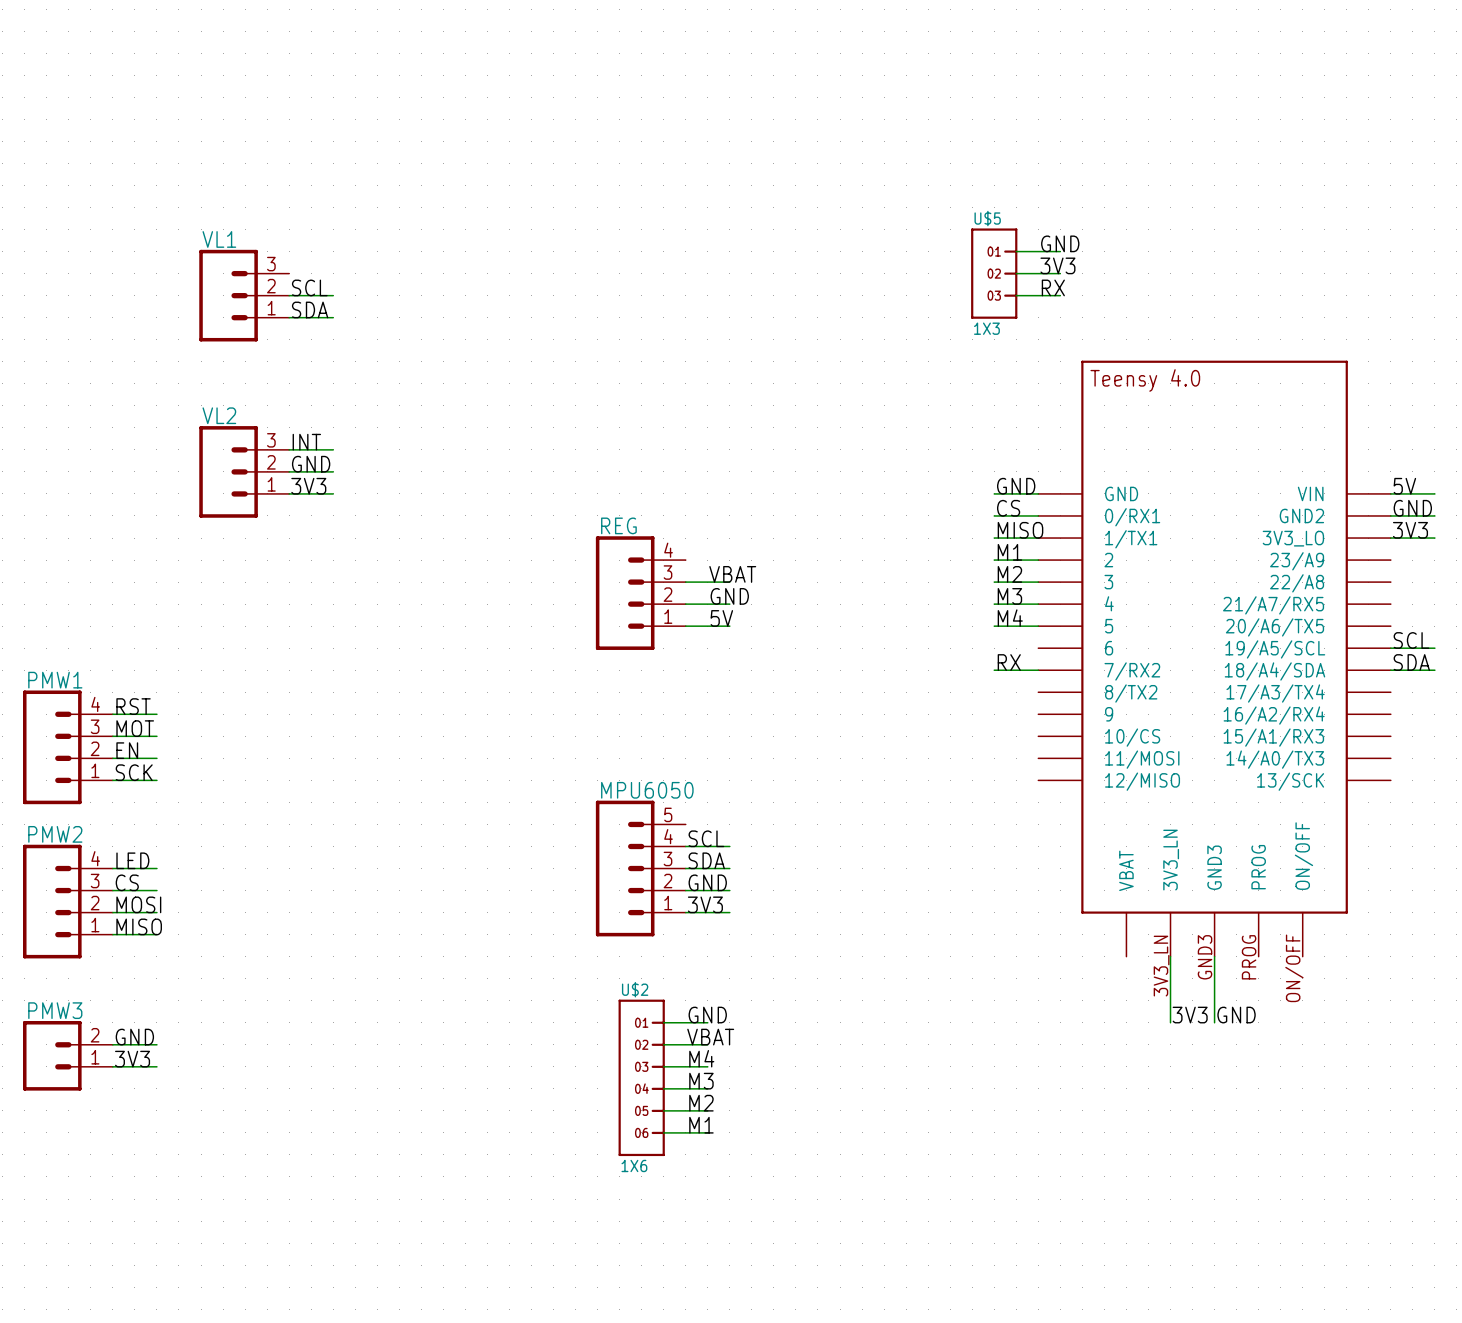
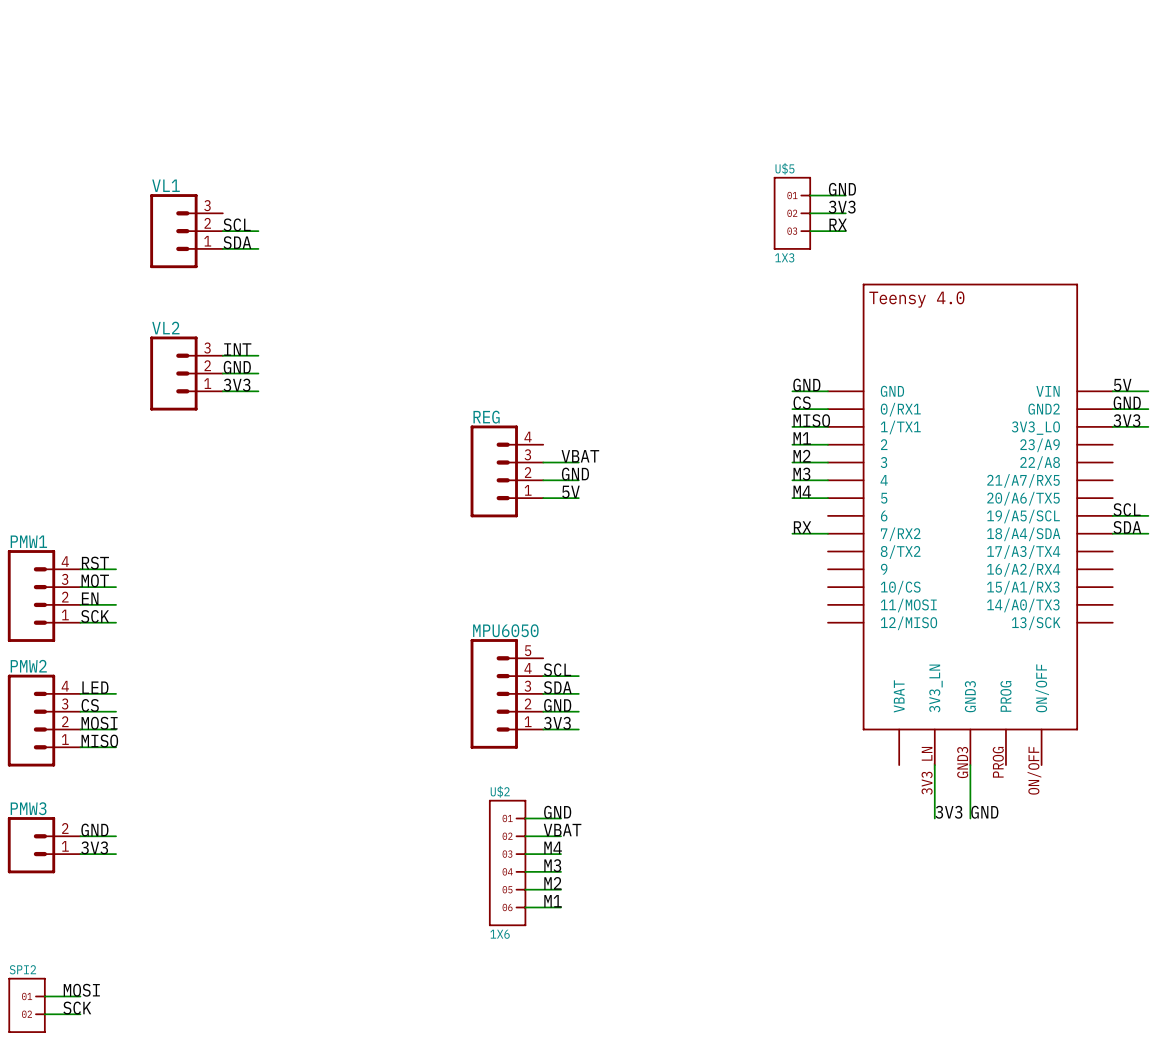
label: none -> MOSI (81, 990)
wire: none -> (44, 996) (80, 996)
SPI2: none -> (27, 1005)
label: none -> SCK (77, 1008)
wire: none -> (44, 1014) (80, 1014)

